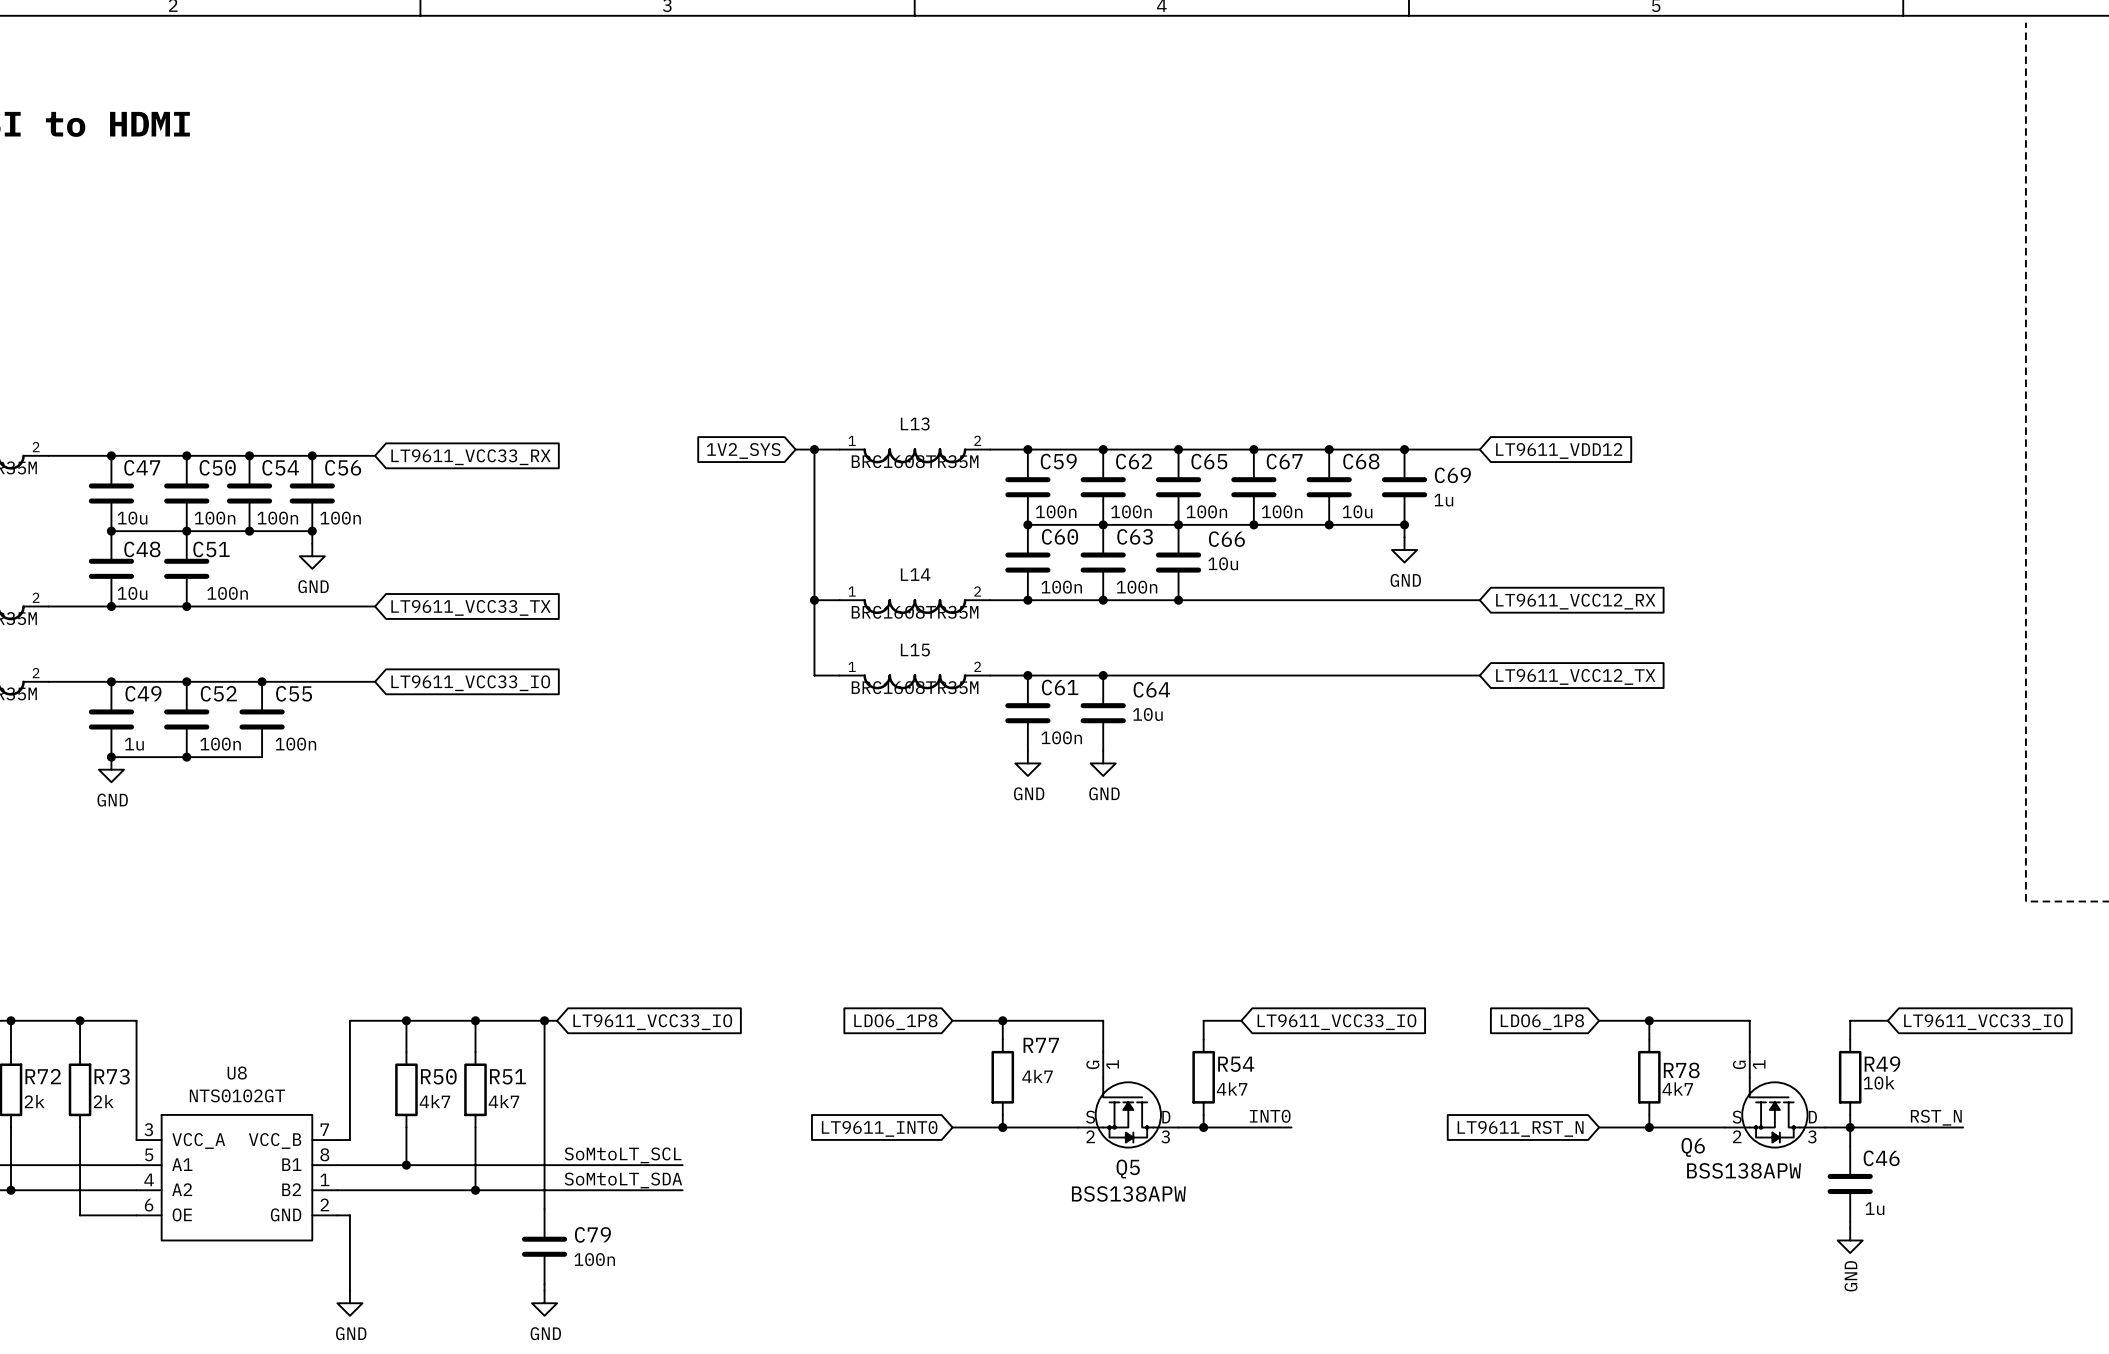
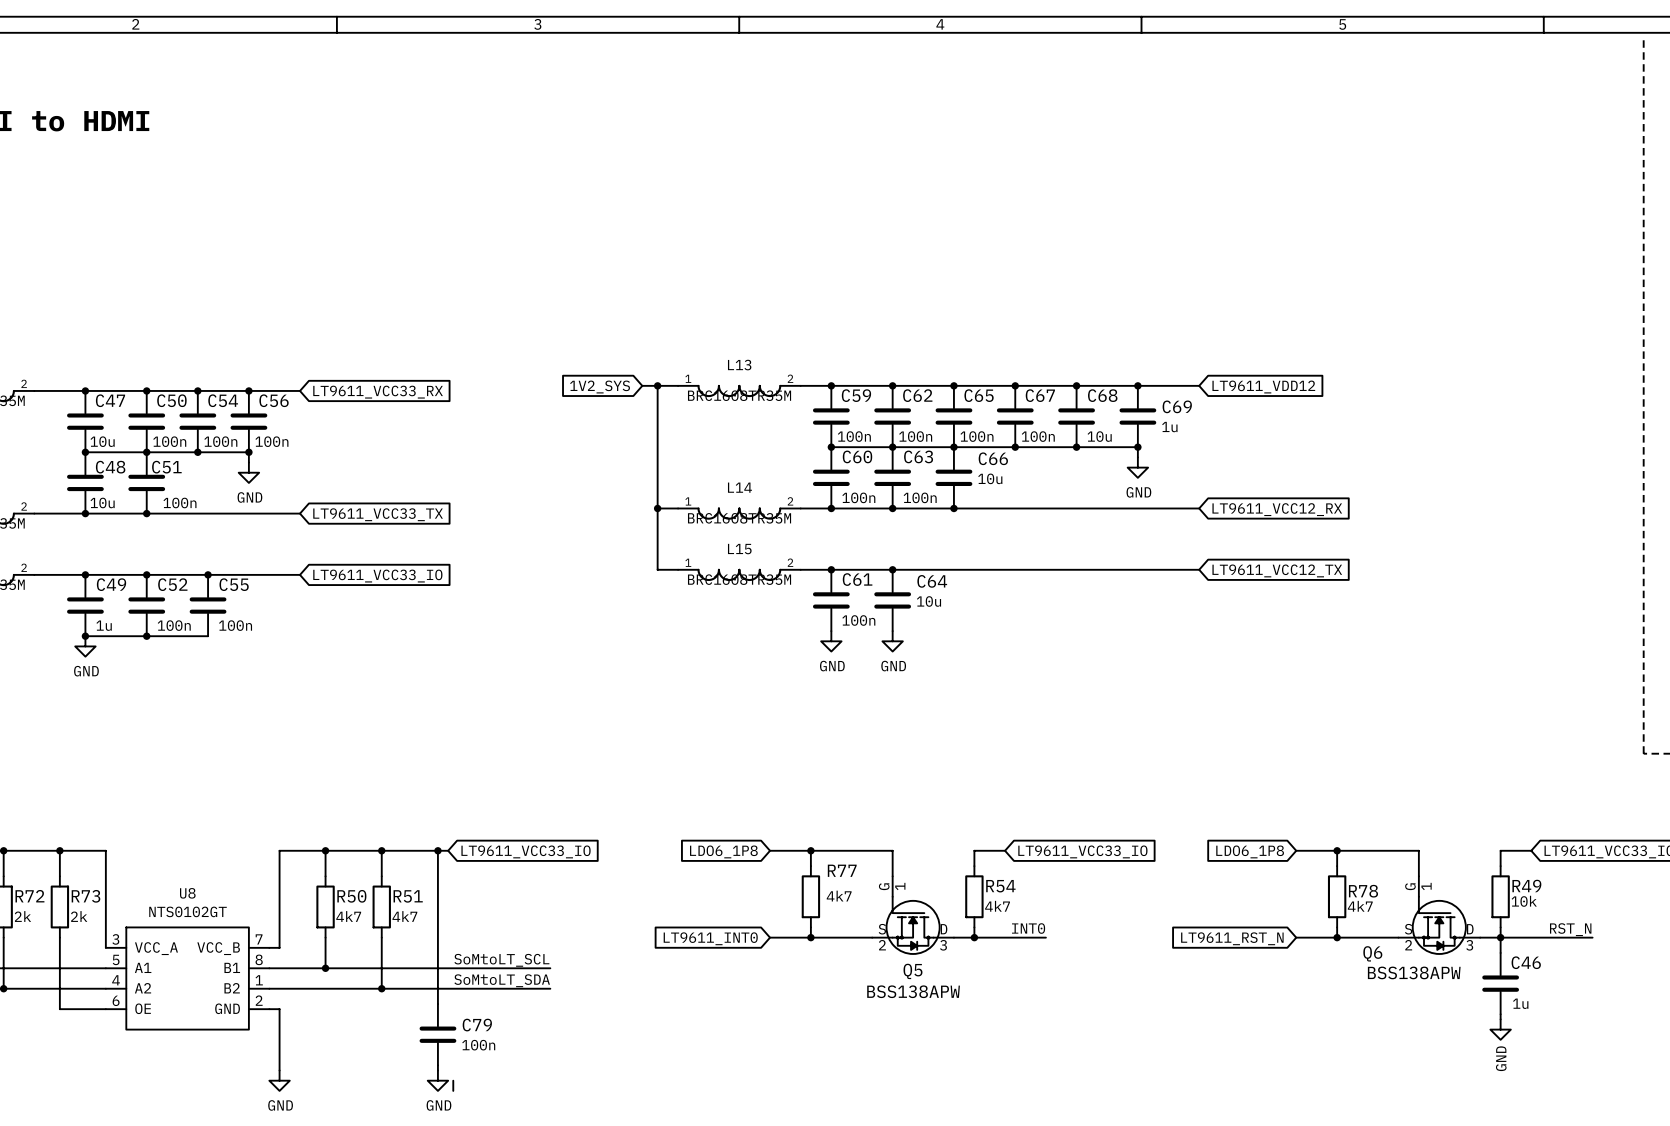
wire: none -> (453, 1080) (453, 1090)

